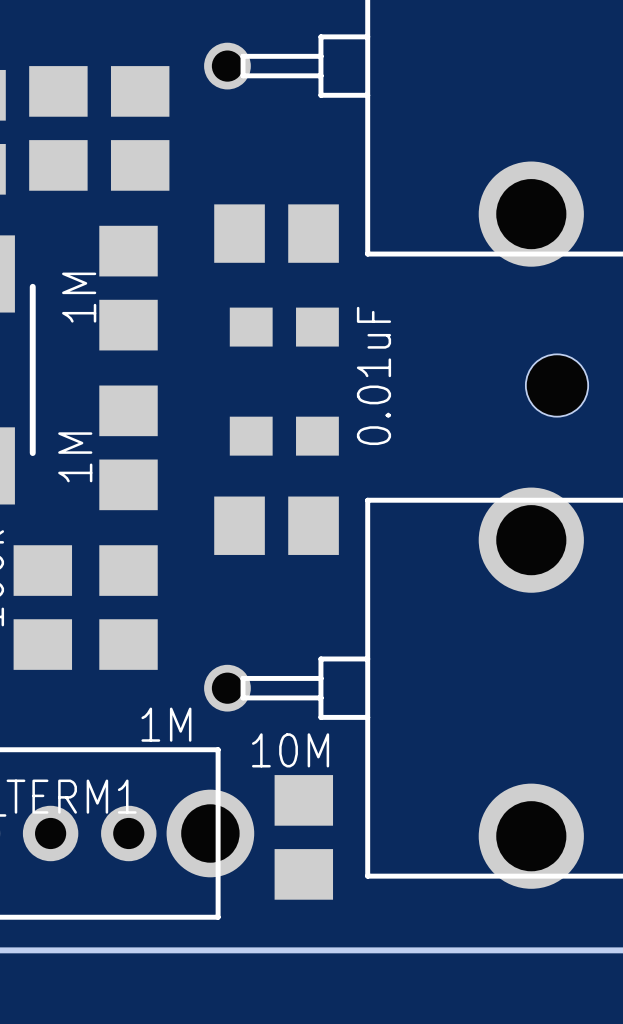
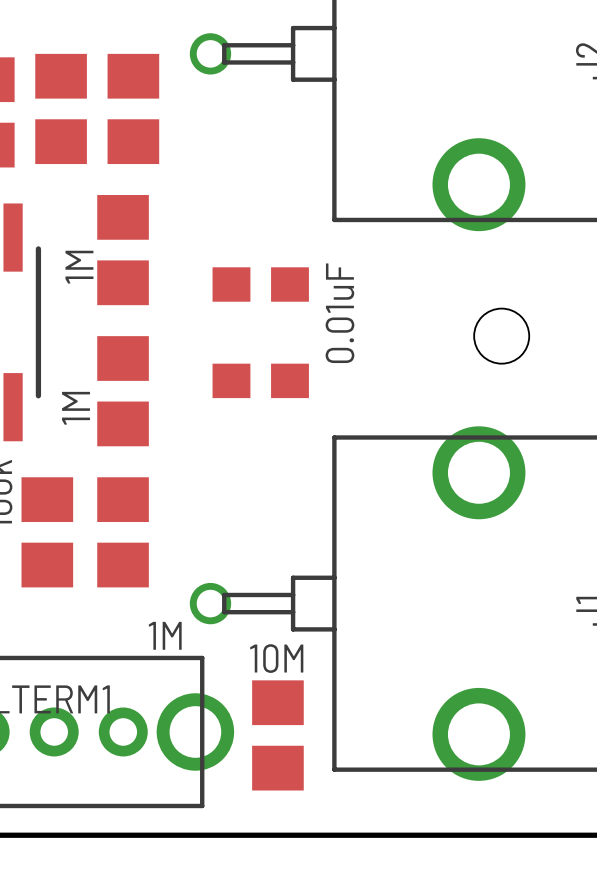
part: (276, 233) -> none
part: (276, 525) -> none

